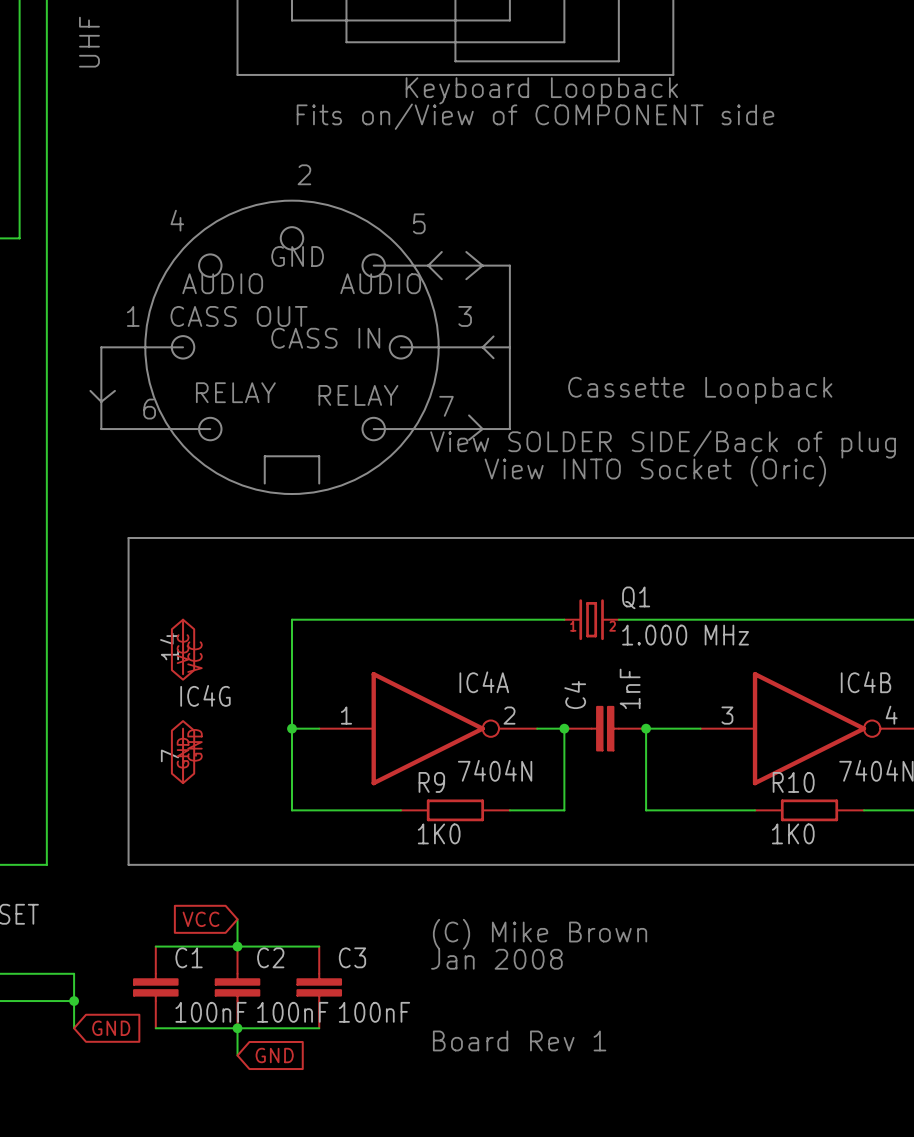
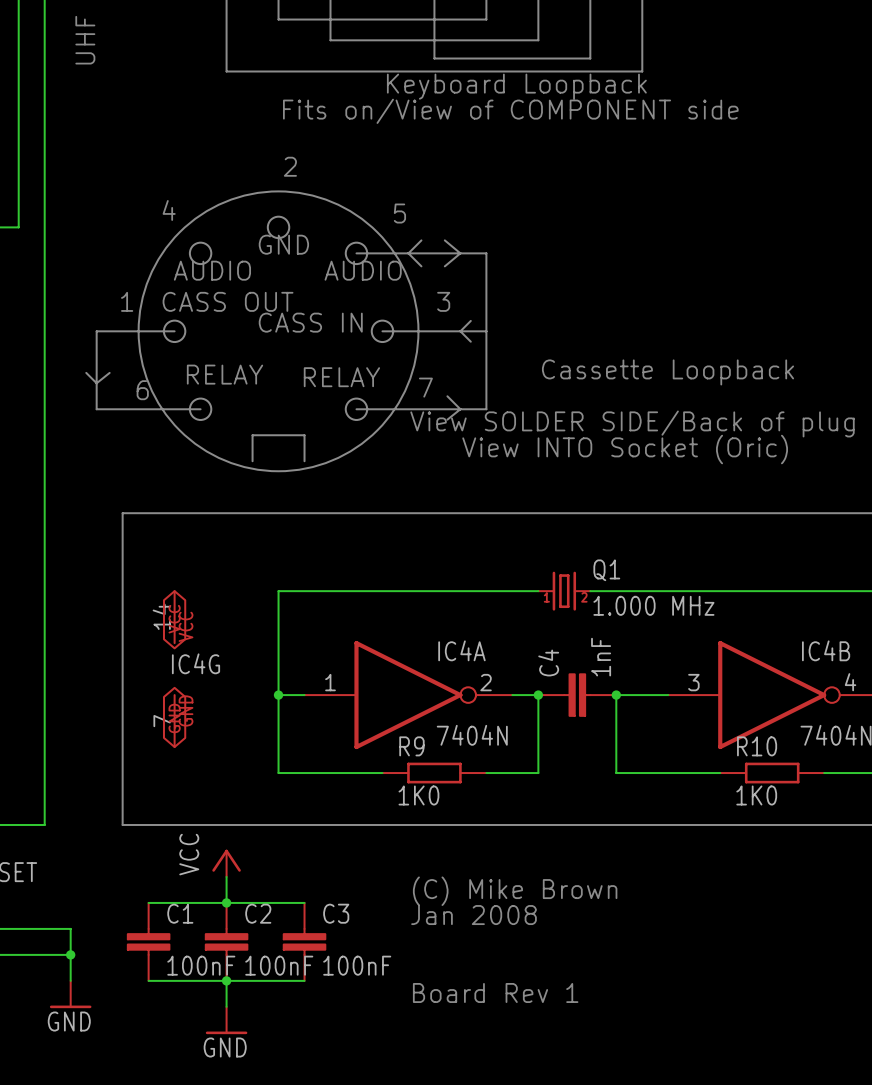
power symbol: none -> VCC (226, 863)
global label: VCC (201, 919) -> none
global label: GND (111, 1028) -> none
power symbol: none -> GND (70, 994)
global label: GND (274, 1055) -> none
power symbol: none -> GND (226, 1020)

